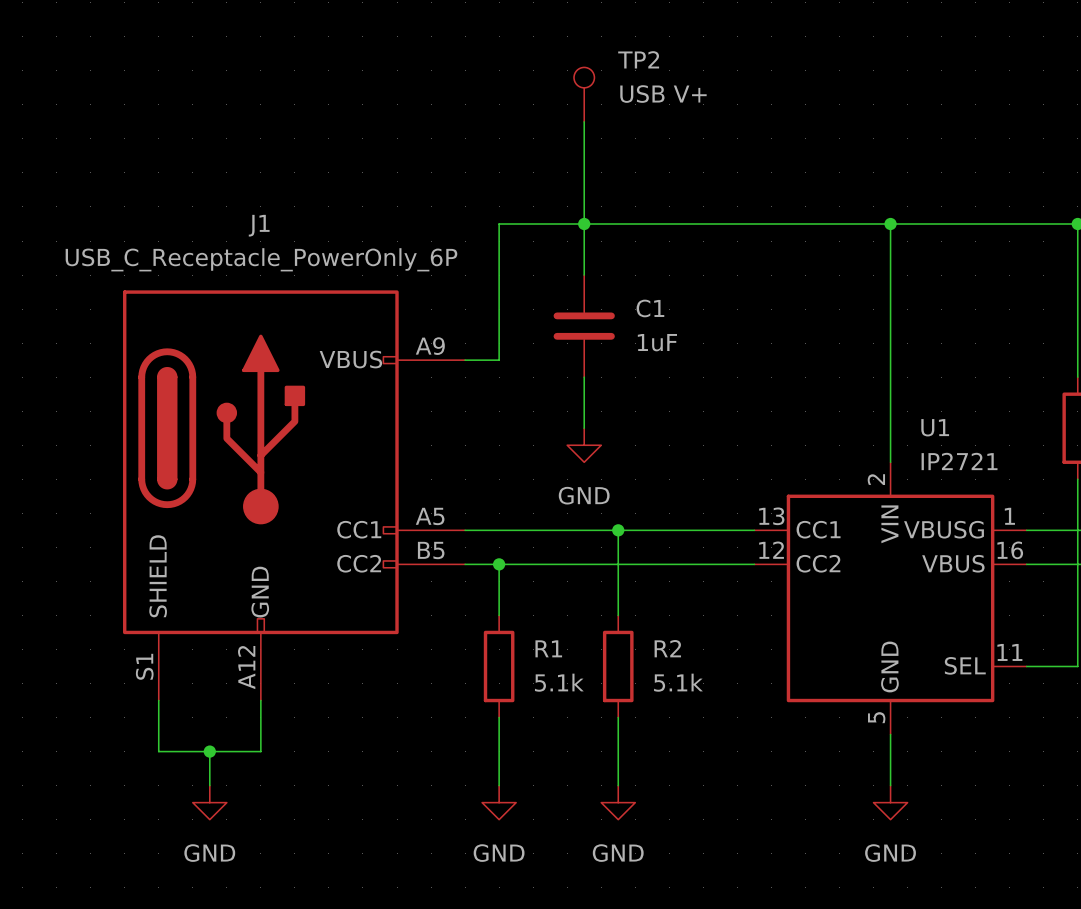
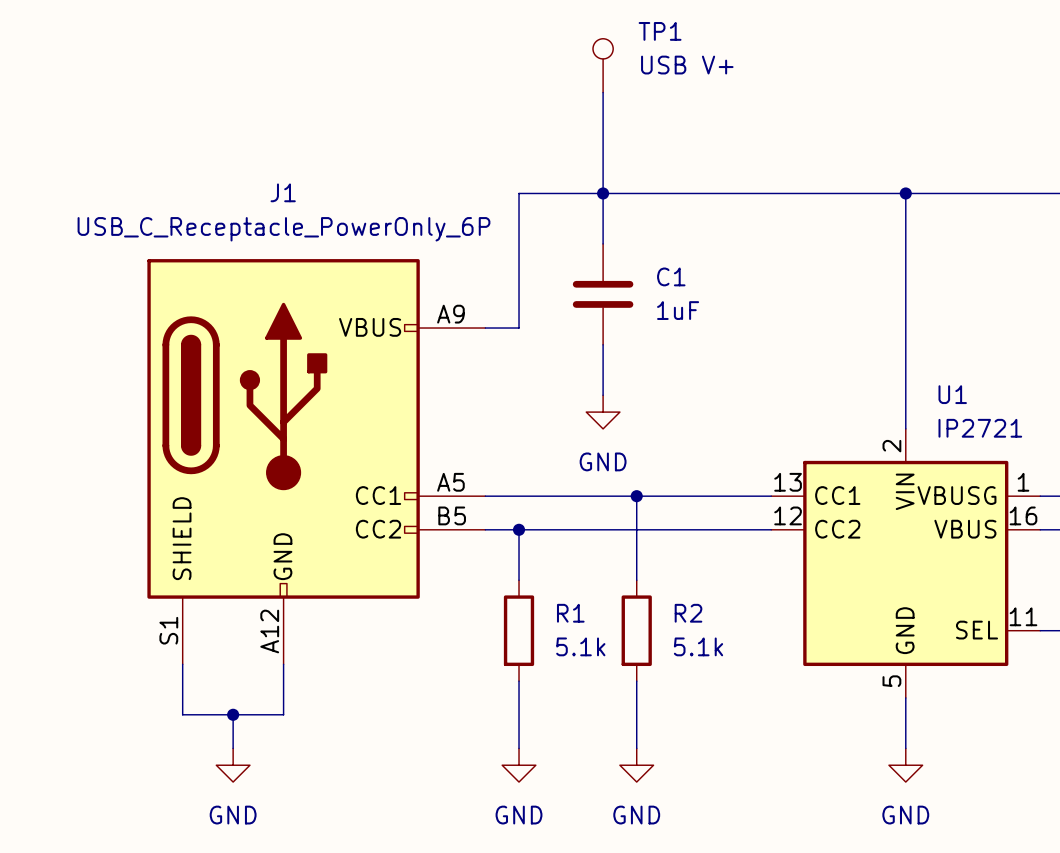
TP2 name: TP2 (638, 59) -> TP1 (660, 31)

